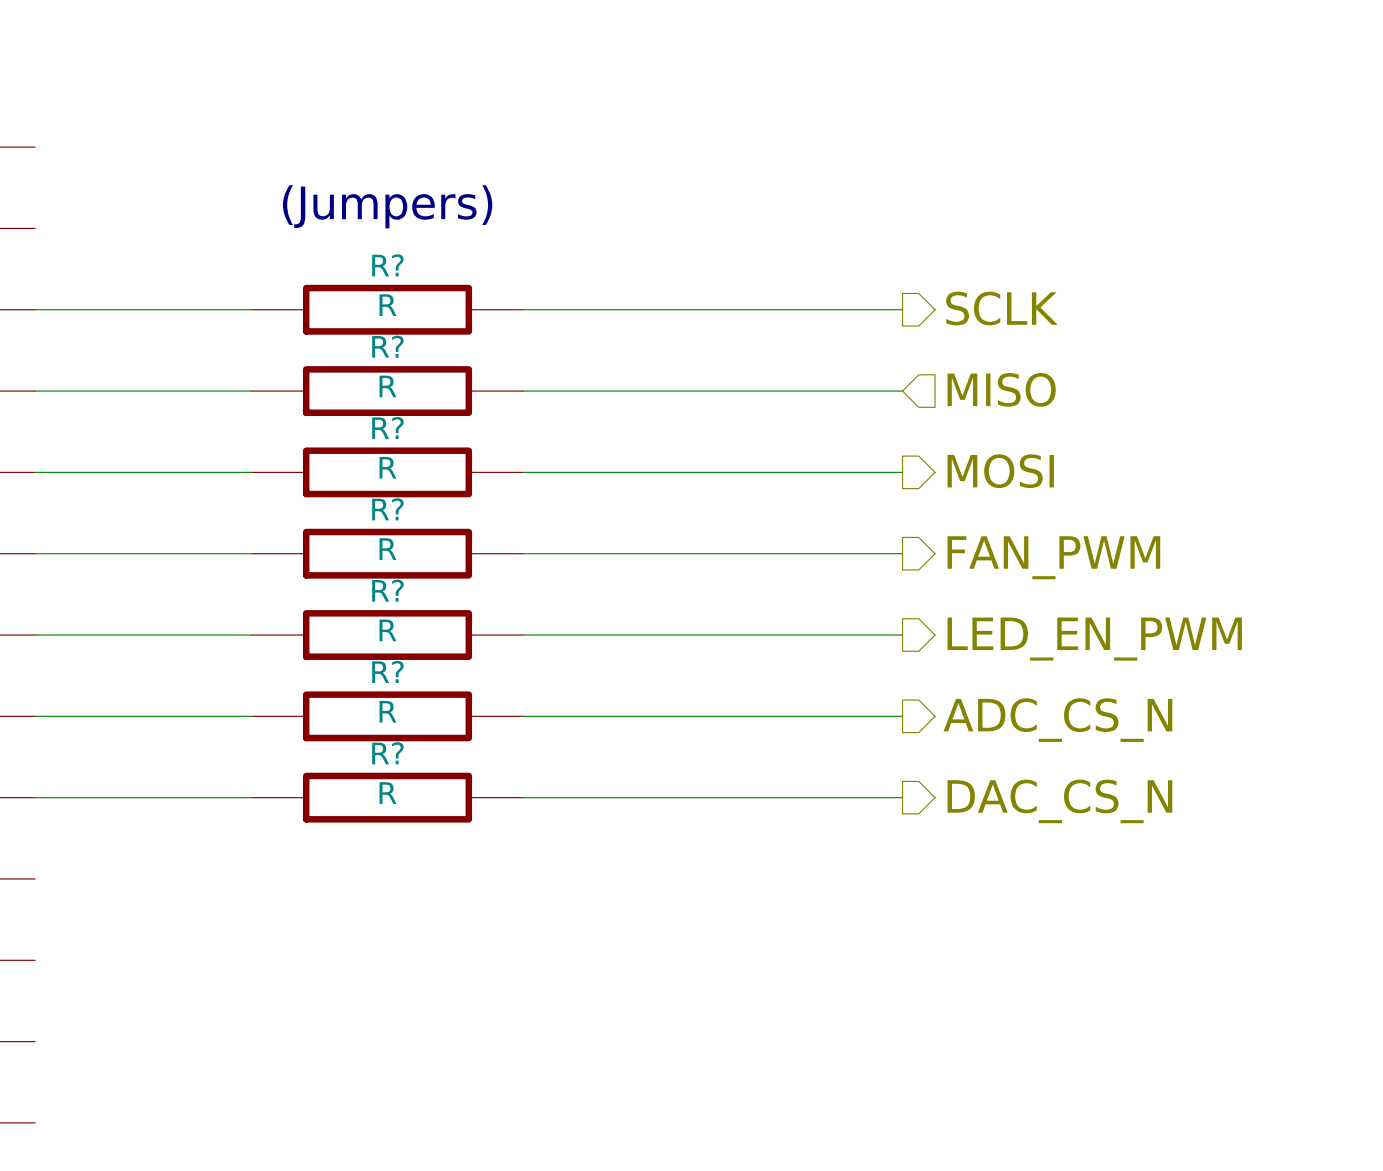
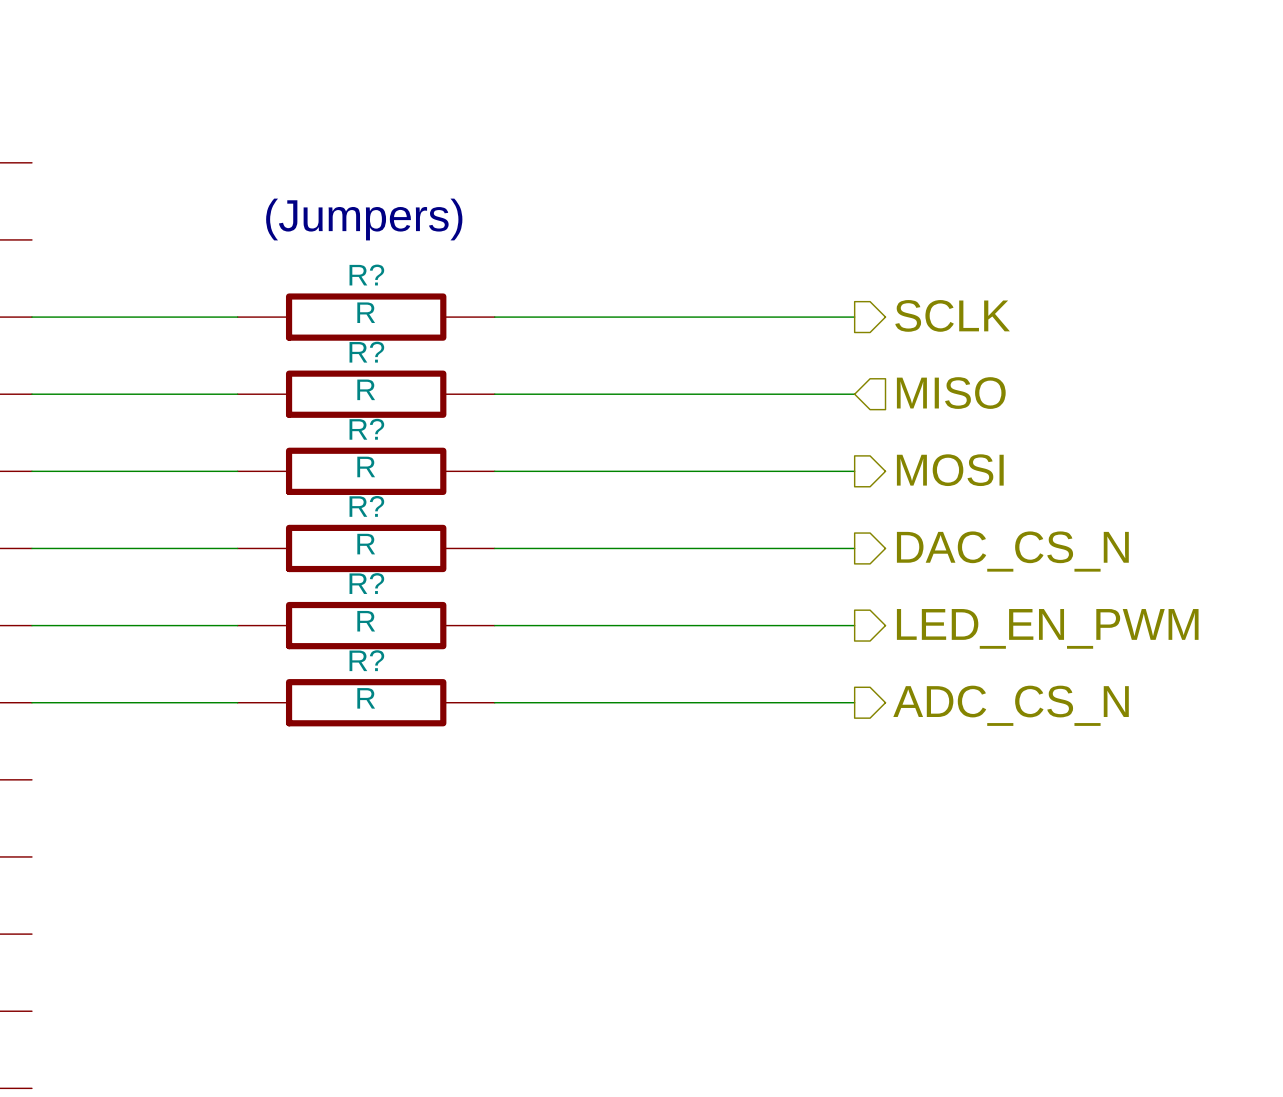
hierarchical label: FAN_PWM (1053, 557) -> DAC_CS_N (1012, 551)
wire: (35, 797) (251, 797) -> none
R?: R (387, 797) -> none
wire: (523, 797) (902, 797) -> none
hierarchical label: DAC_CS_N (1059, 801) -> none

